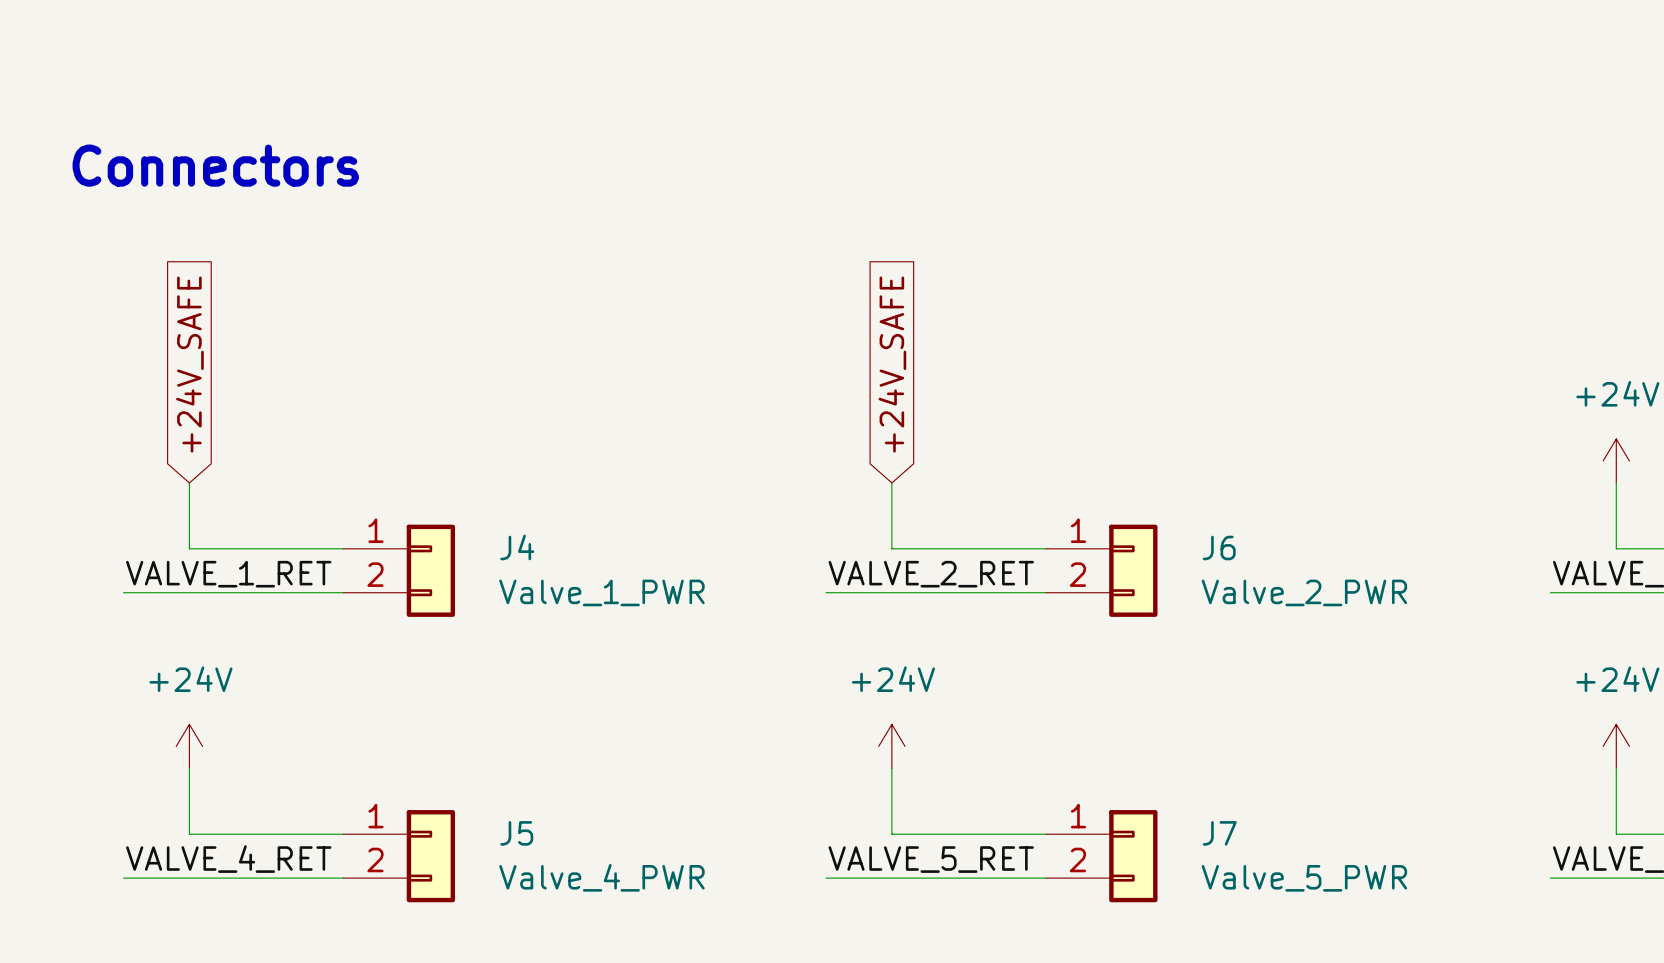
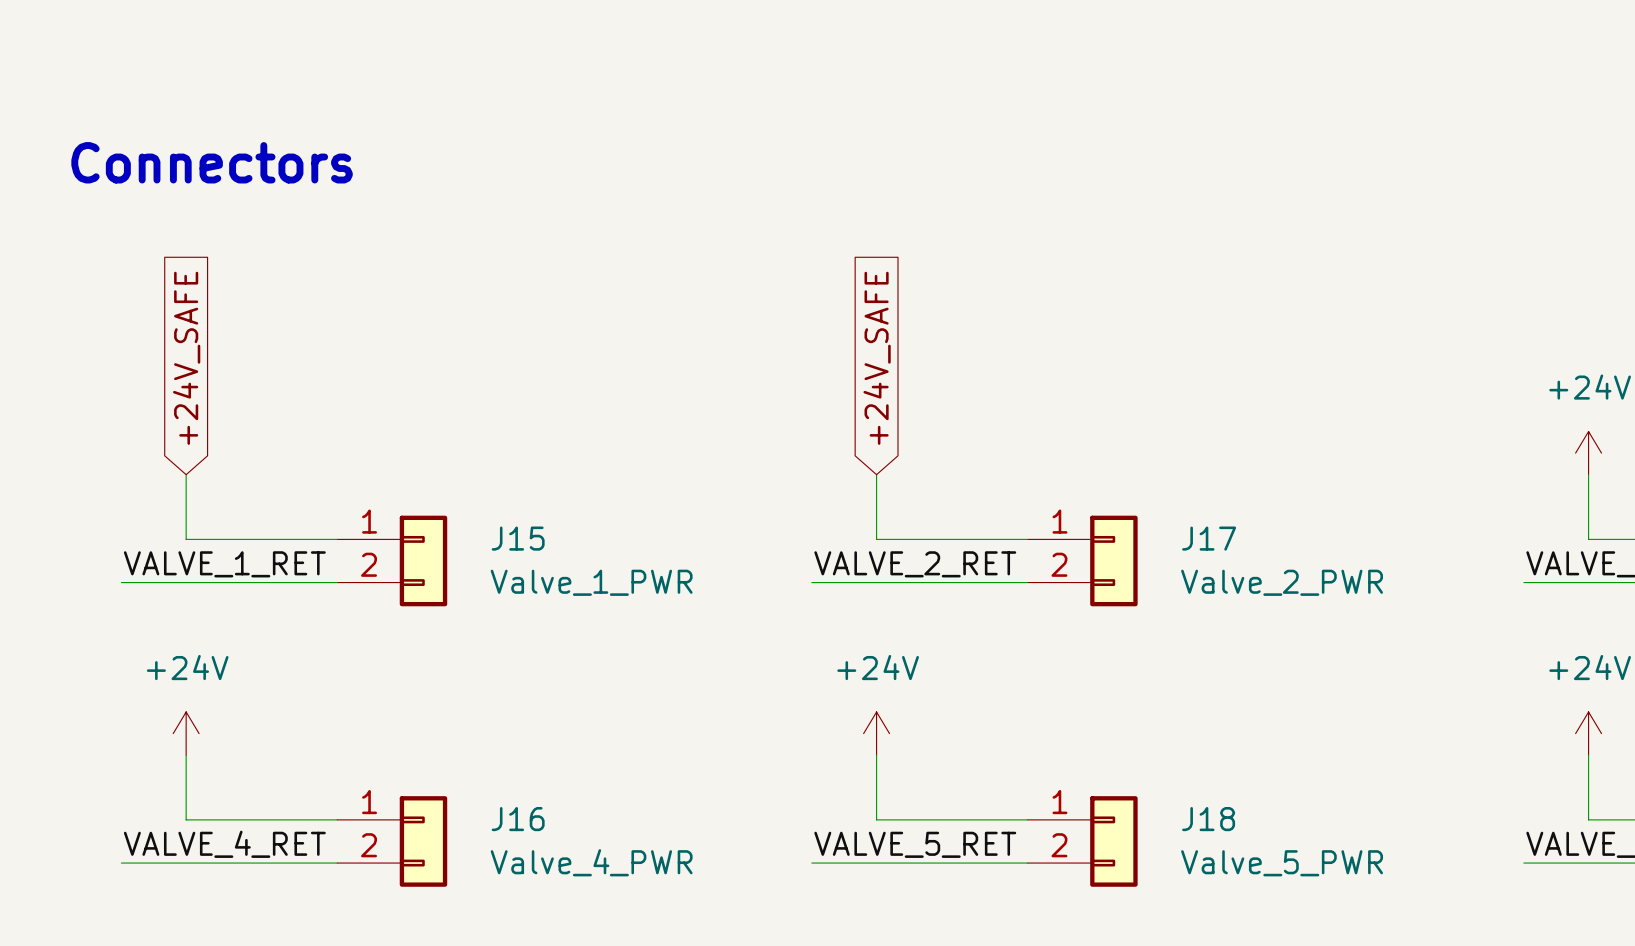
J4 name: J4 (517, 547) -> J15 (518, 538)
J6 name: J6 (1219, 548) -> J17 (1209, 538)
J5 name: J5 (516, 833) -> J16 (518, 819)
J7 name: J7 (1219, 833) -> J18 (1208, 819)

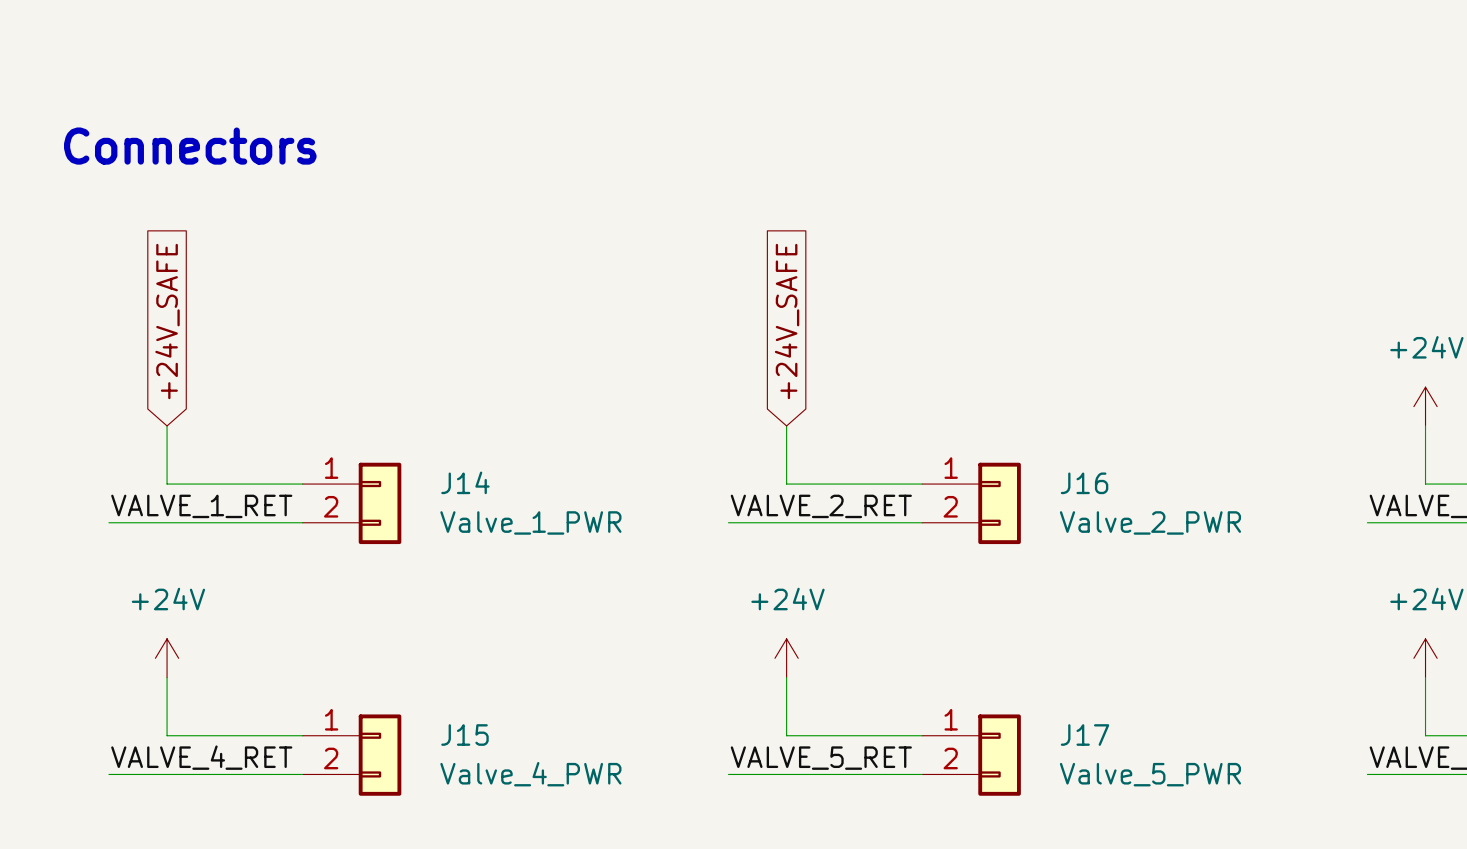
J15 name: J15 (518, 538) -> J14 (465, 482)
J17 name: J17 (1209, 538) -> J16 (1084, 483)
J16 name: J16 (518, 819) -> J15 (464, 735)
J18 name: J18 (1208, 819) -> J17 (1085, 735)

